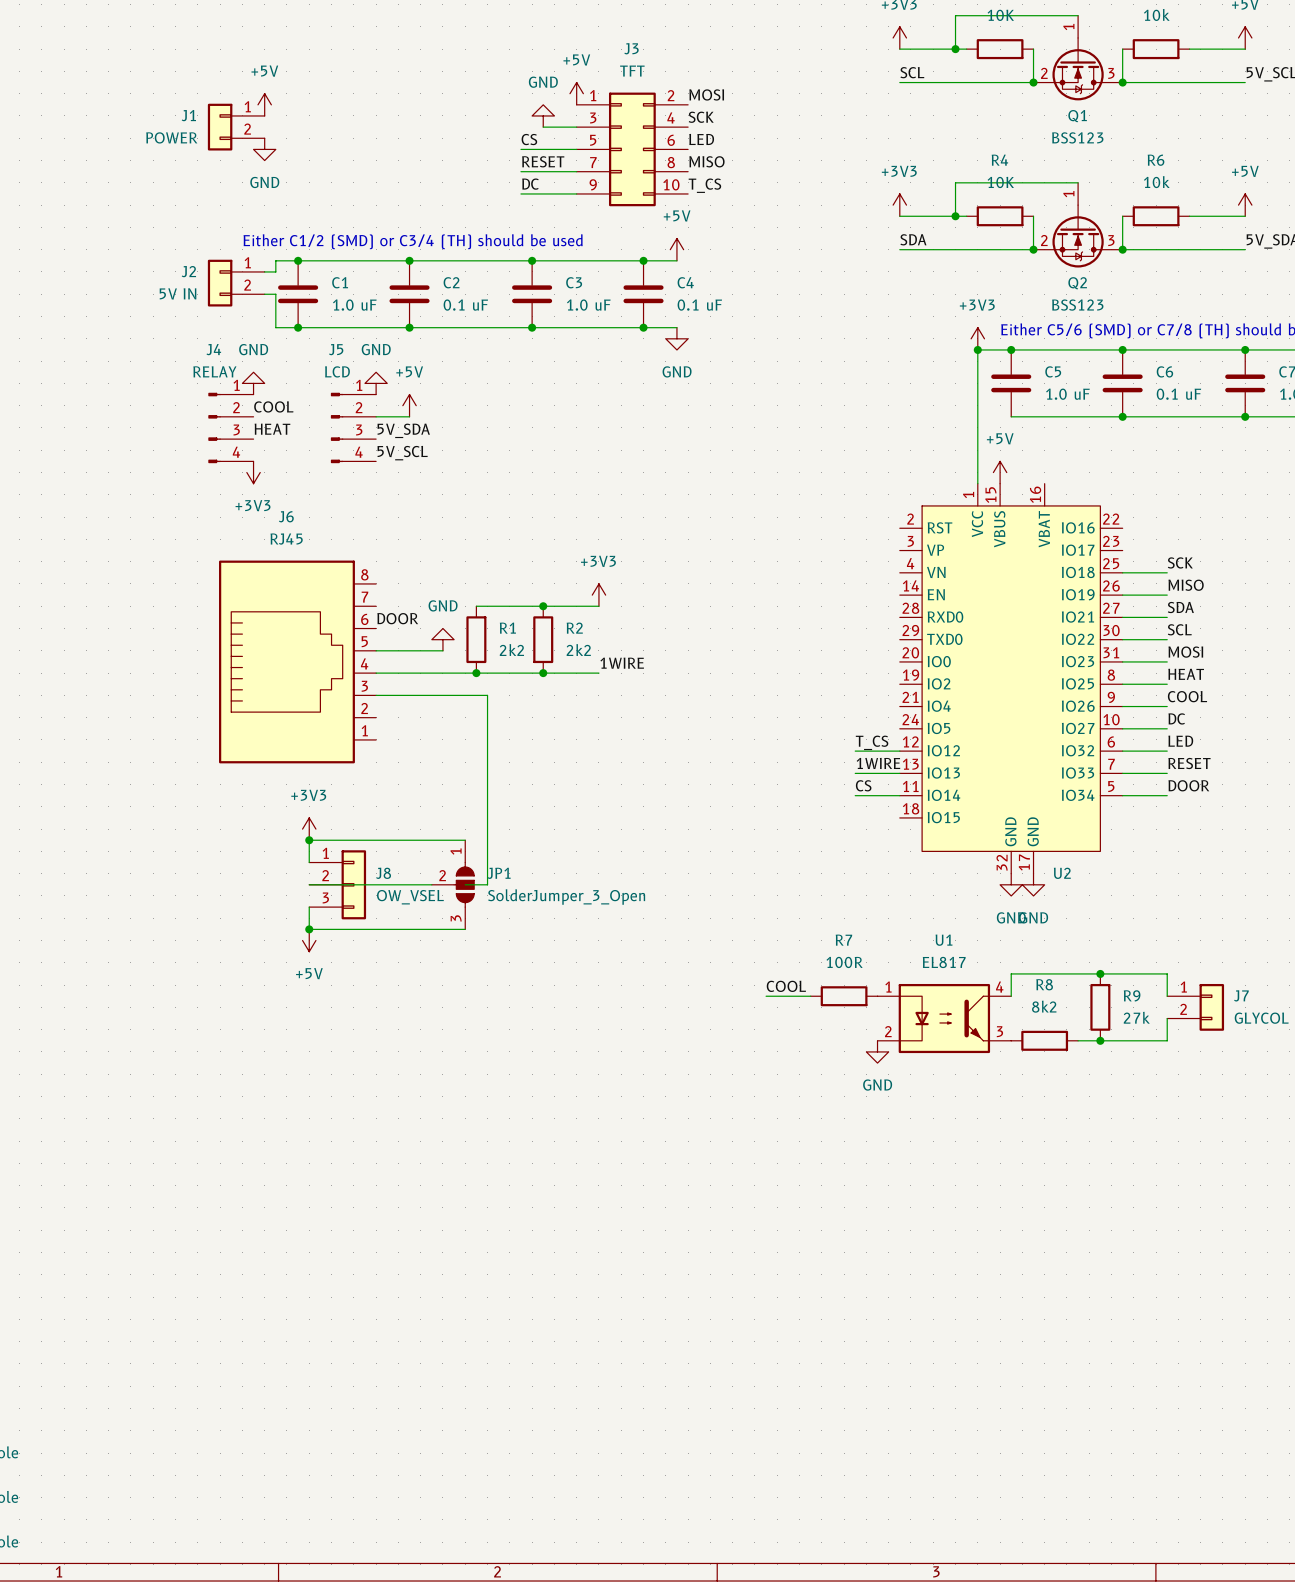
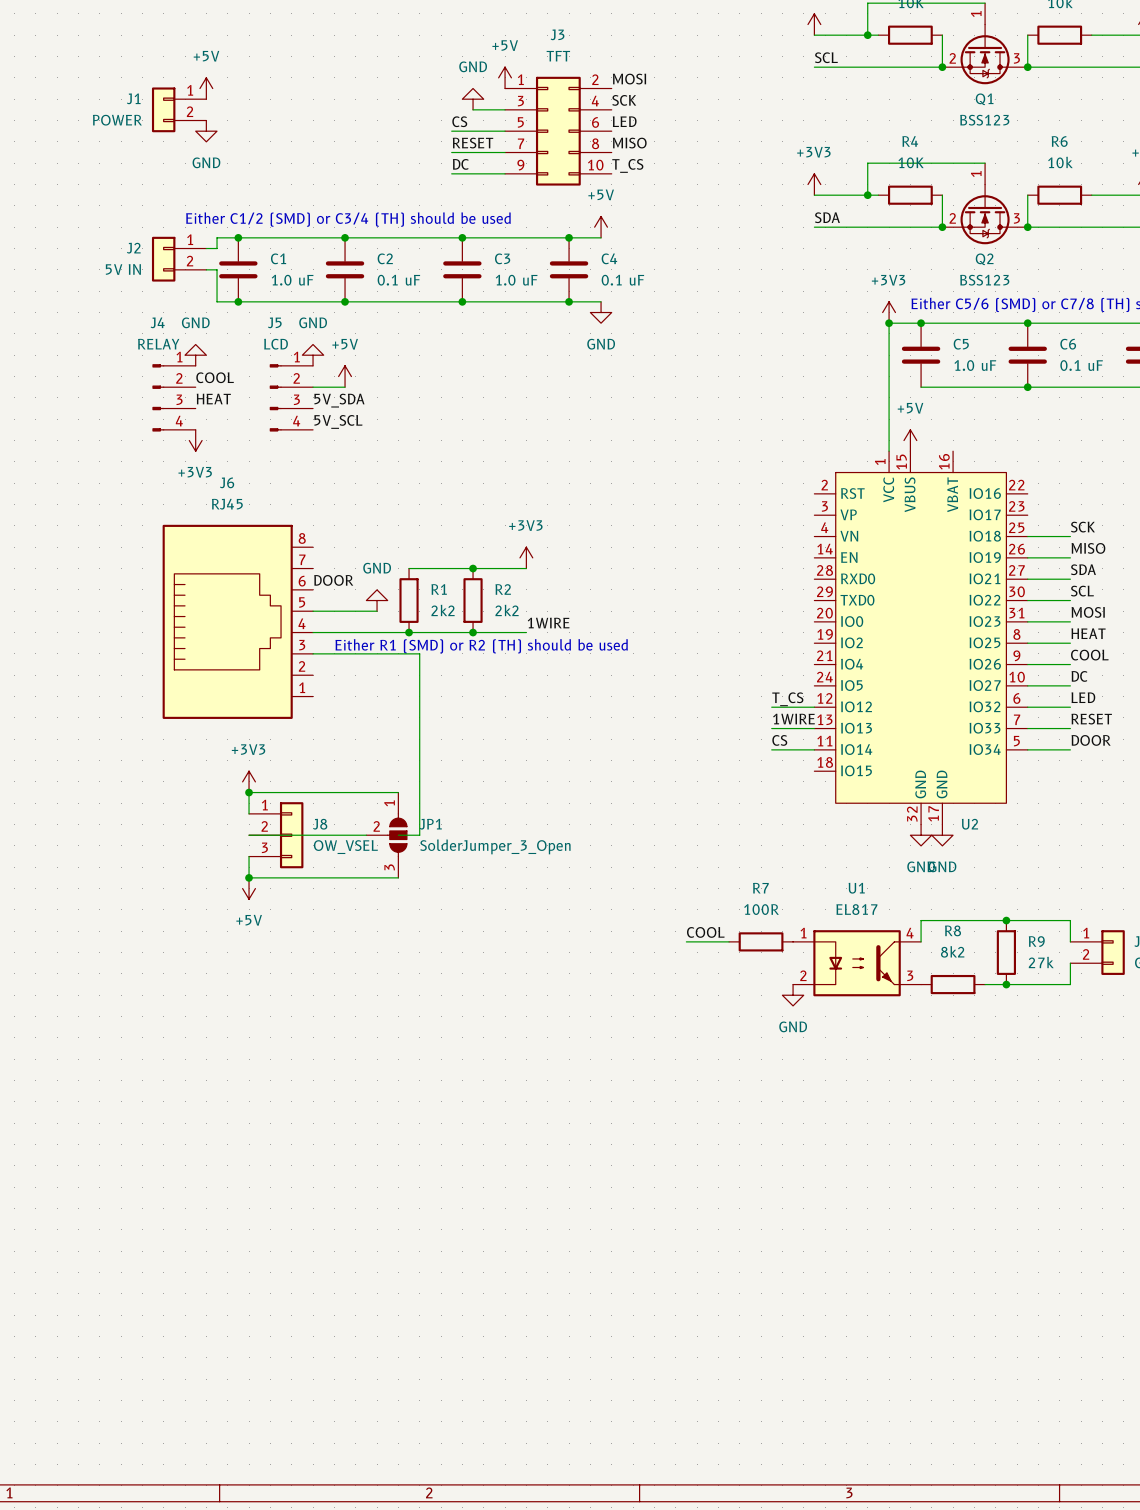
text: none -> Either R1 (SMD) or R2 (TH) should be used (481, 646)

